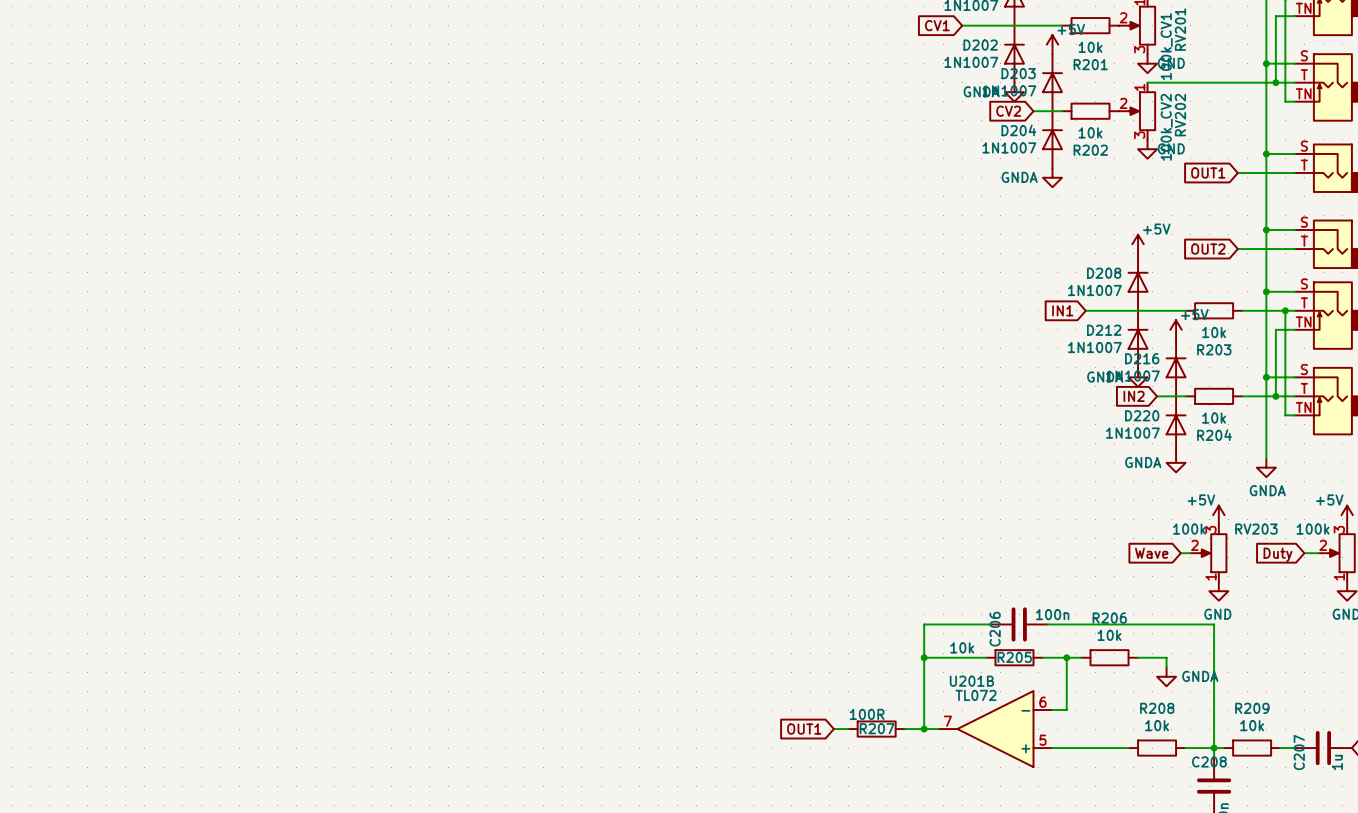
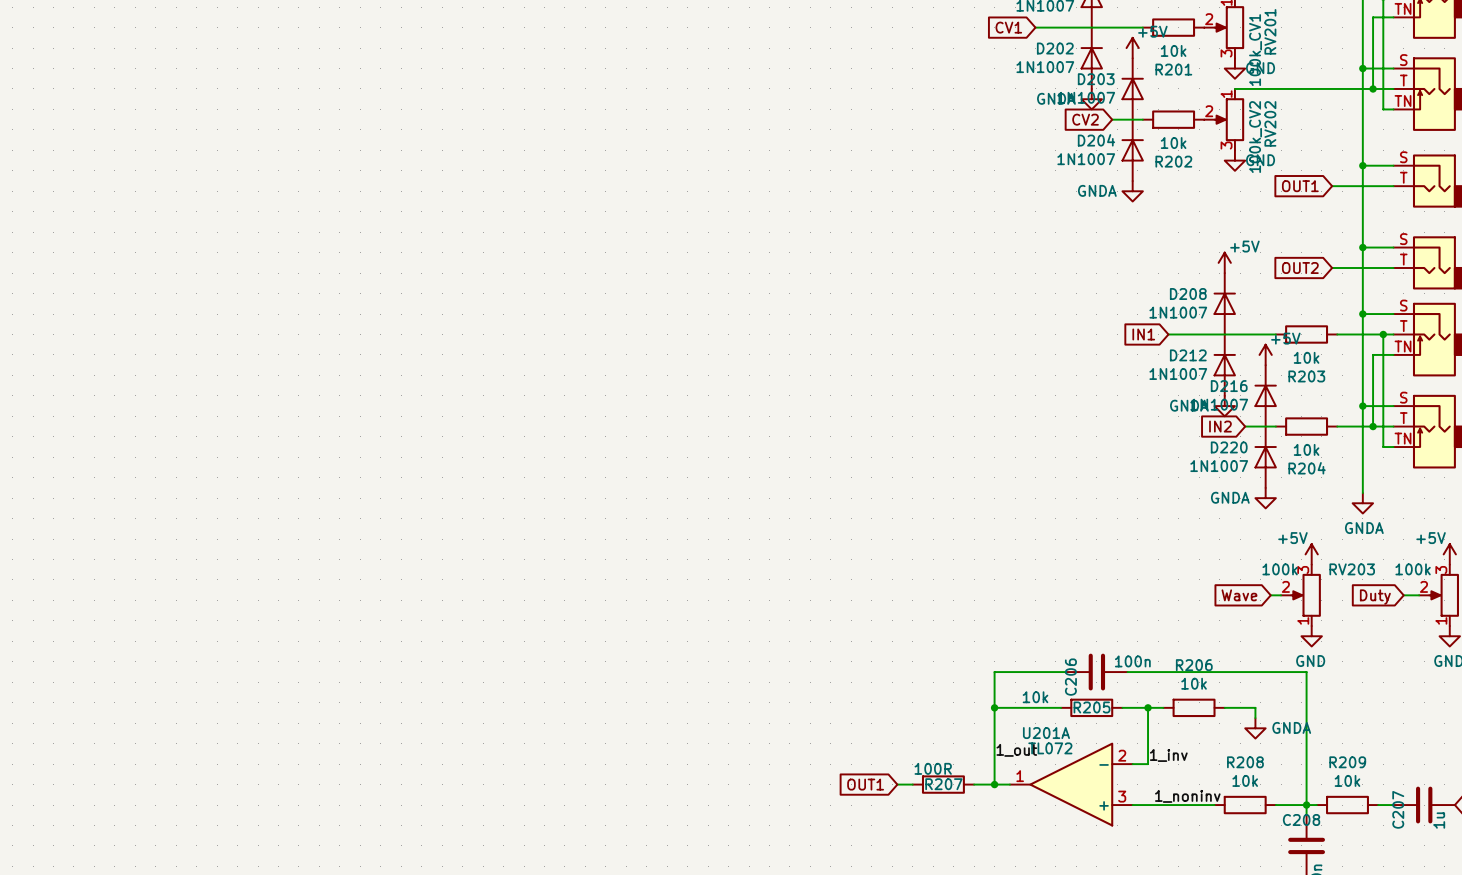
U201B name: U201B (971, 681) -> U201A (1046, 733)
label: none -> 1_out (1016, 750)
U201B pin number: 6 (1042, 702) -> 2 (1122, 755)
label: none -> 1_inv (1168, 755)
U201B pin number: 7 (947, 721) -> 1 (1020, 776)
U201B pin number: 5 (1042, 740) -> 3 (1122, 796)
label: none -> 1_noninv (1187, 796)

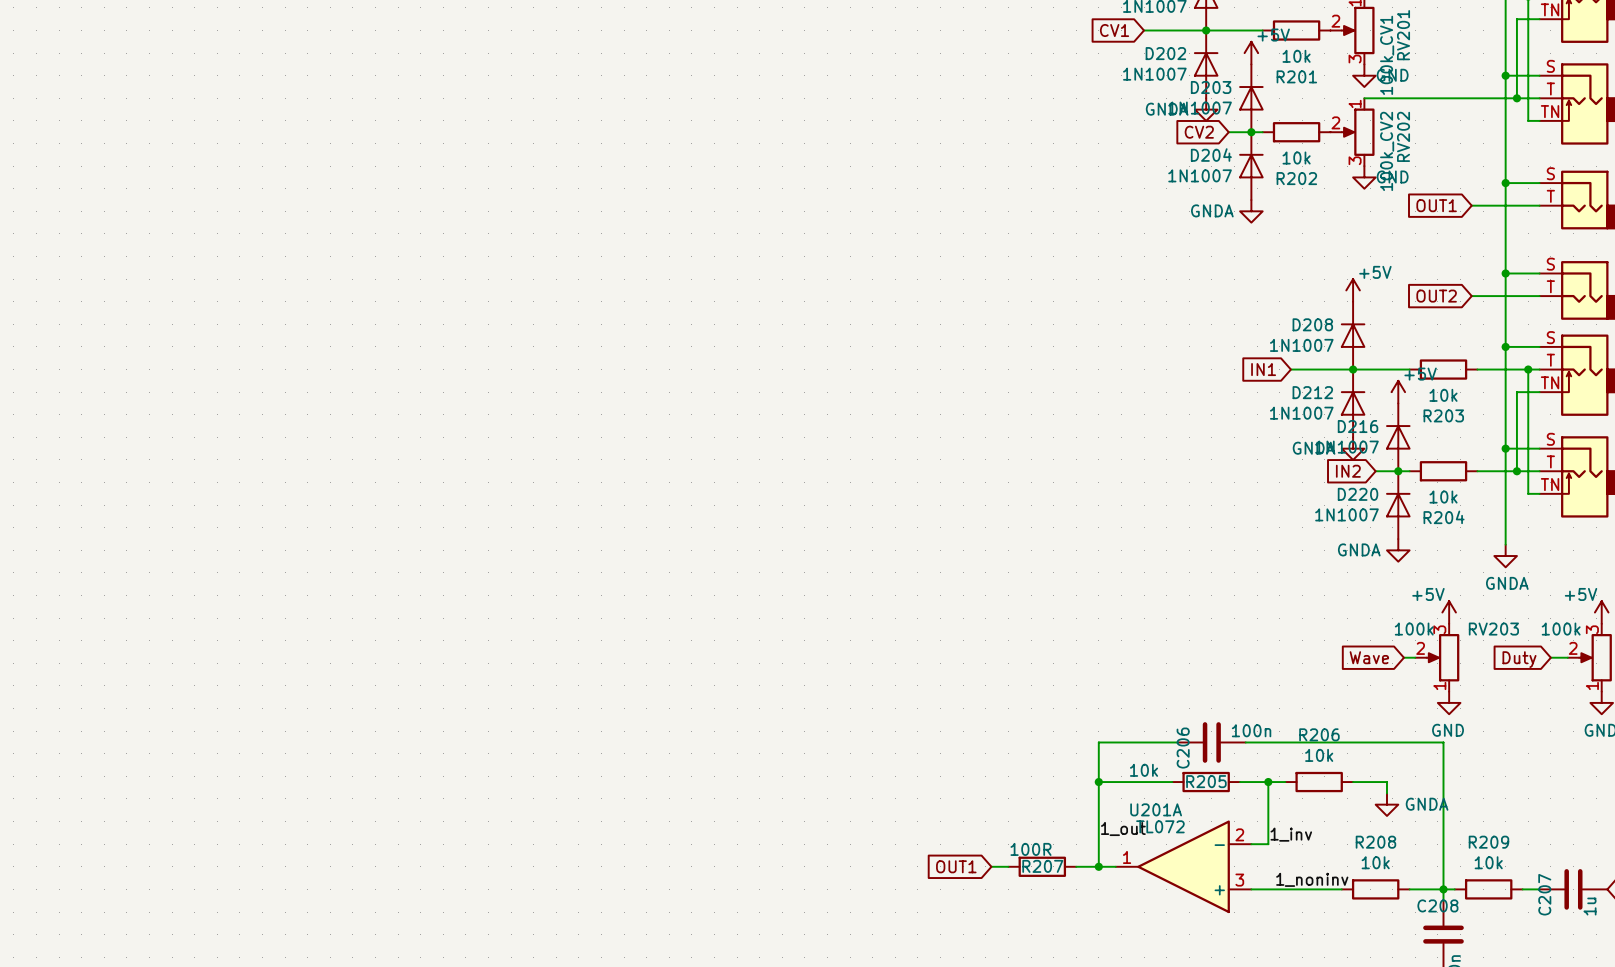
junction: none -> (1206, 30)
junction: none -> (1251, 132)
junction: none -> (1353, 369)
junction: none -> (1398, 471)

